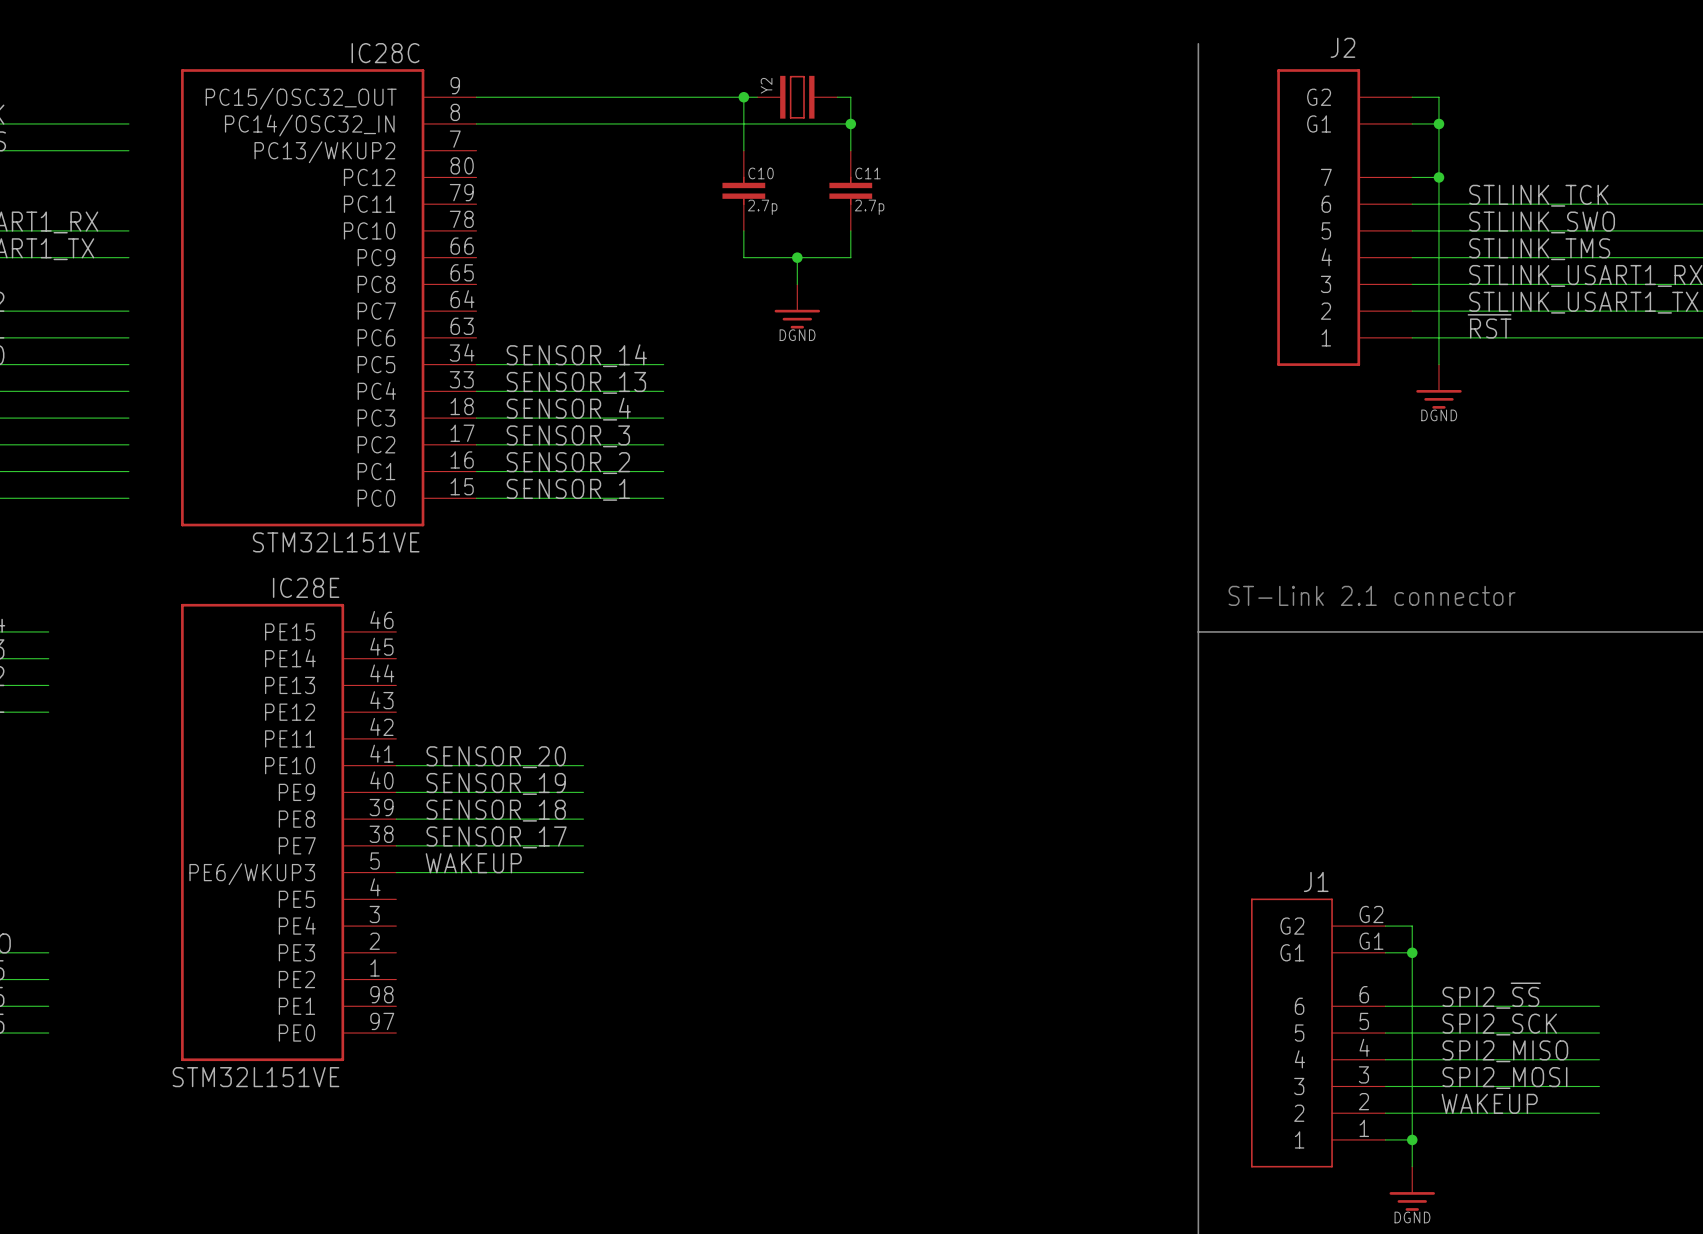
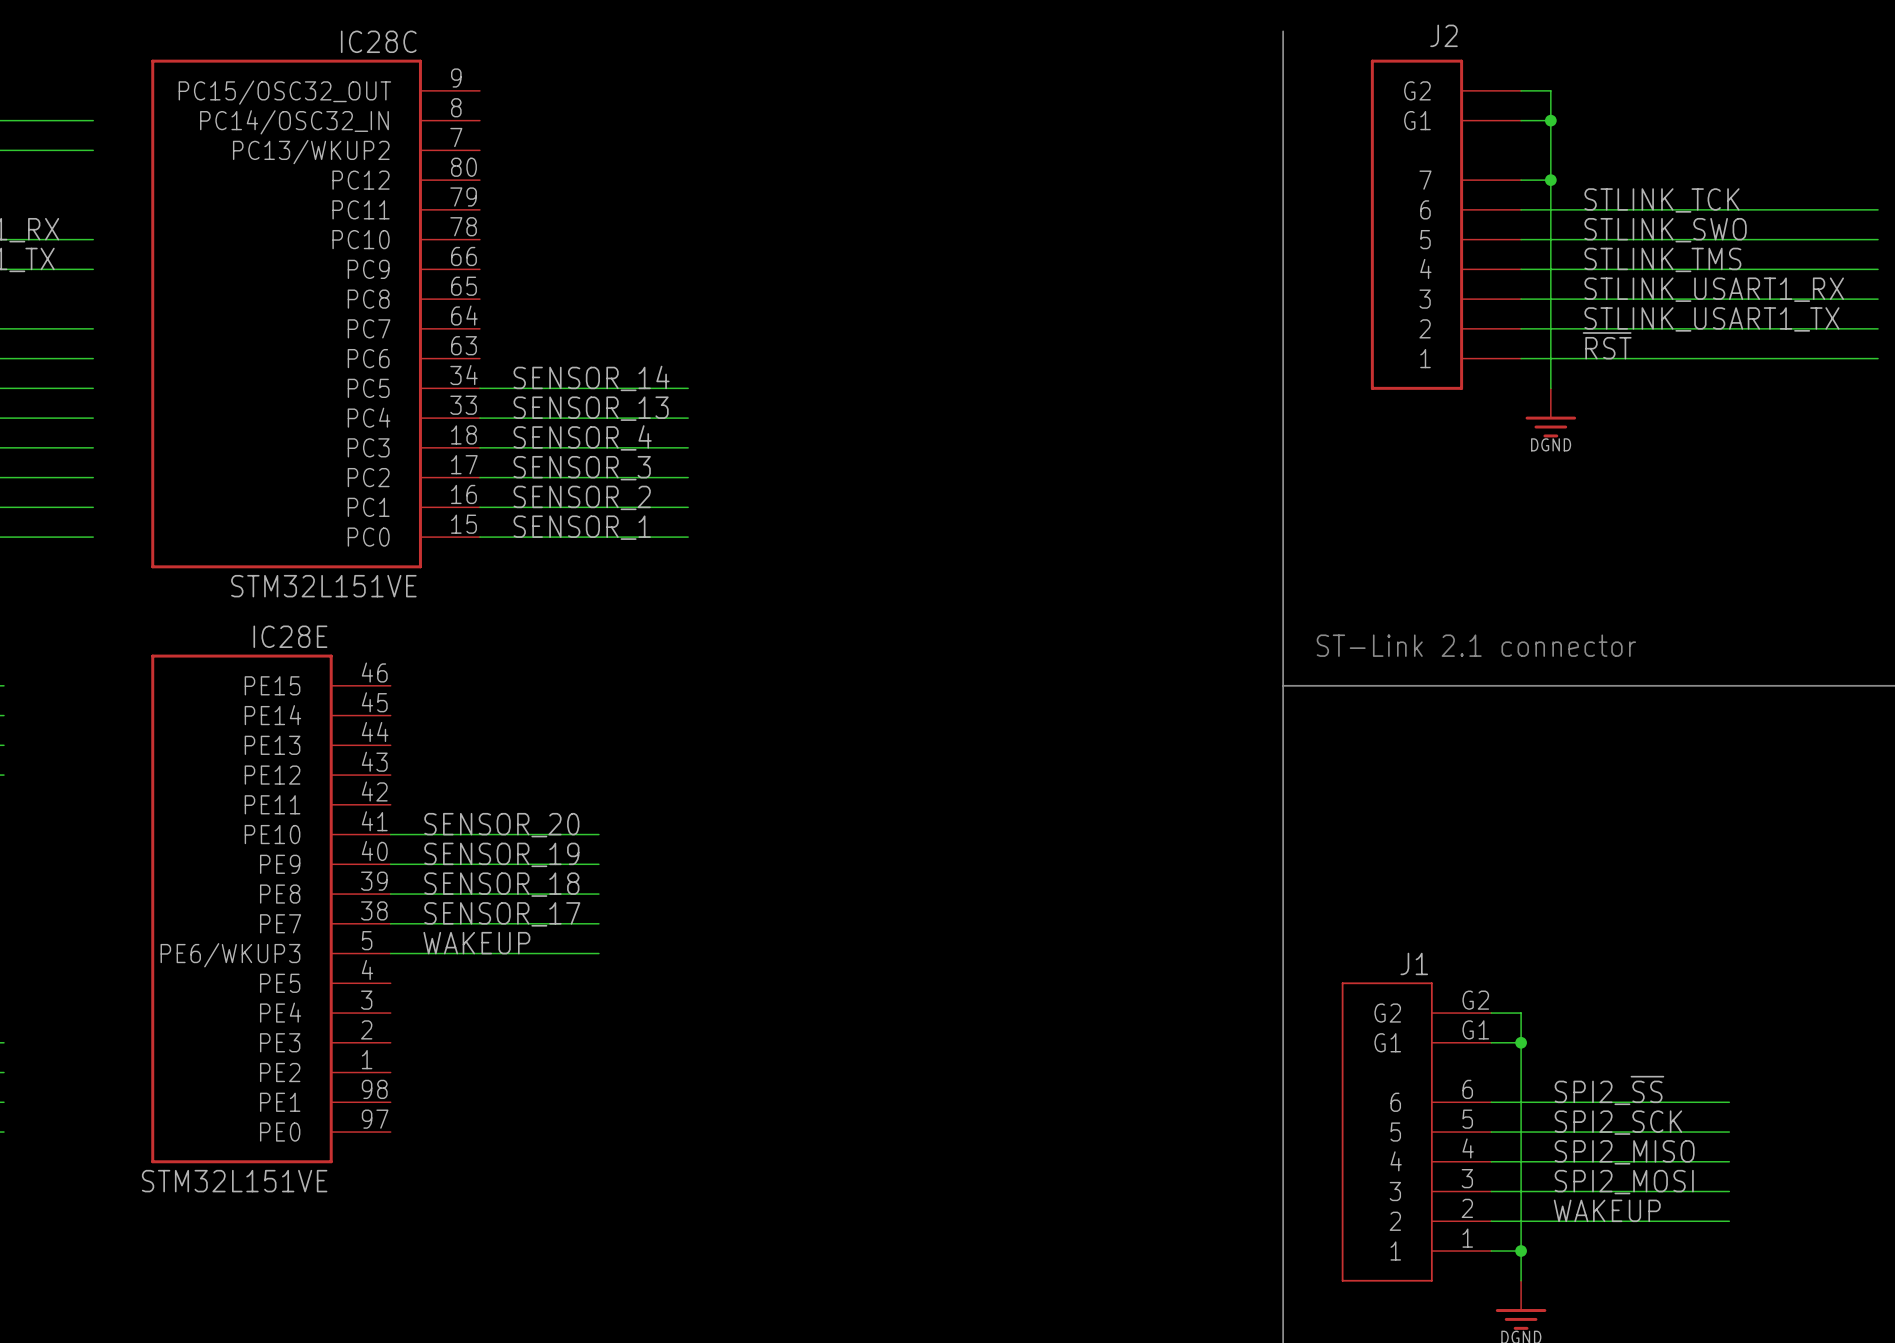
wire: (476, 97) (757, 97) -> none
wire: (743, 97) (743, 150) -> none
junction: (743, 97) -> none
Y2: (797, 97) -> none
wire: (837, 97) (850, 97) (850, 150) -> none
wire: (476, 123) (850, 123) -> none
junction: (850, 123) -> none
C10: 2.7p (743, 190) -> none
C11: 2.7p (850, 190) -> none
wire: (743, 230) (743, 257) (850, 257) (850, 230) -> none
wire: (797, 257) (797, 284) -> none
junction: (797, 257) -> none
power symbol: DGND (797, 306) -> none

